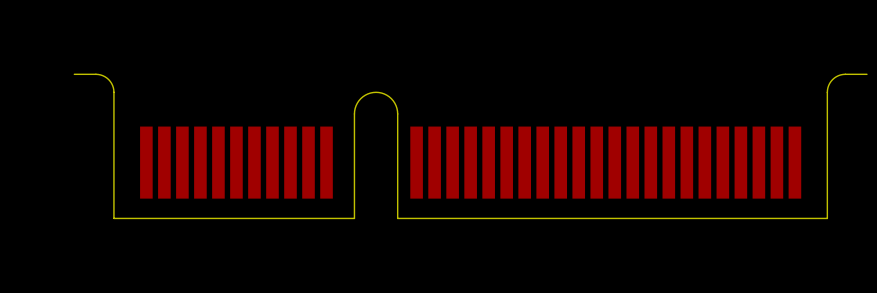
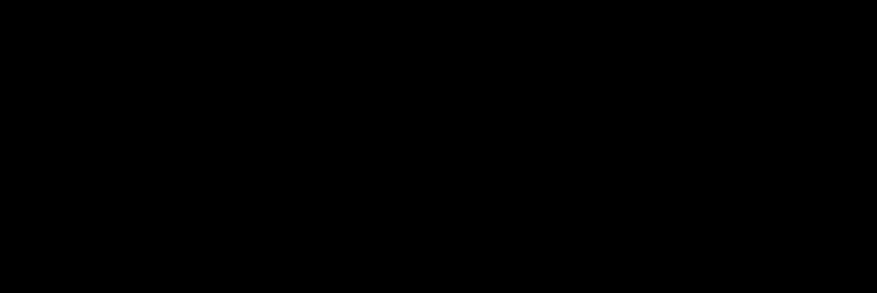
part: (470, 146) -> none

